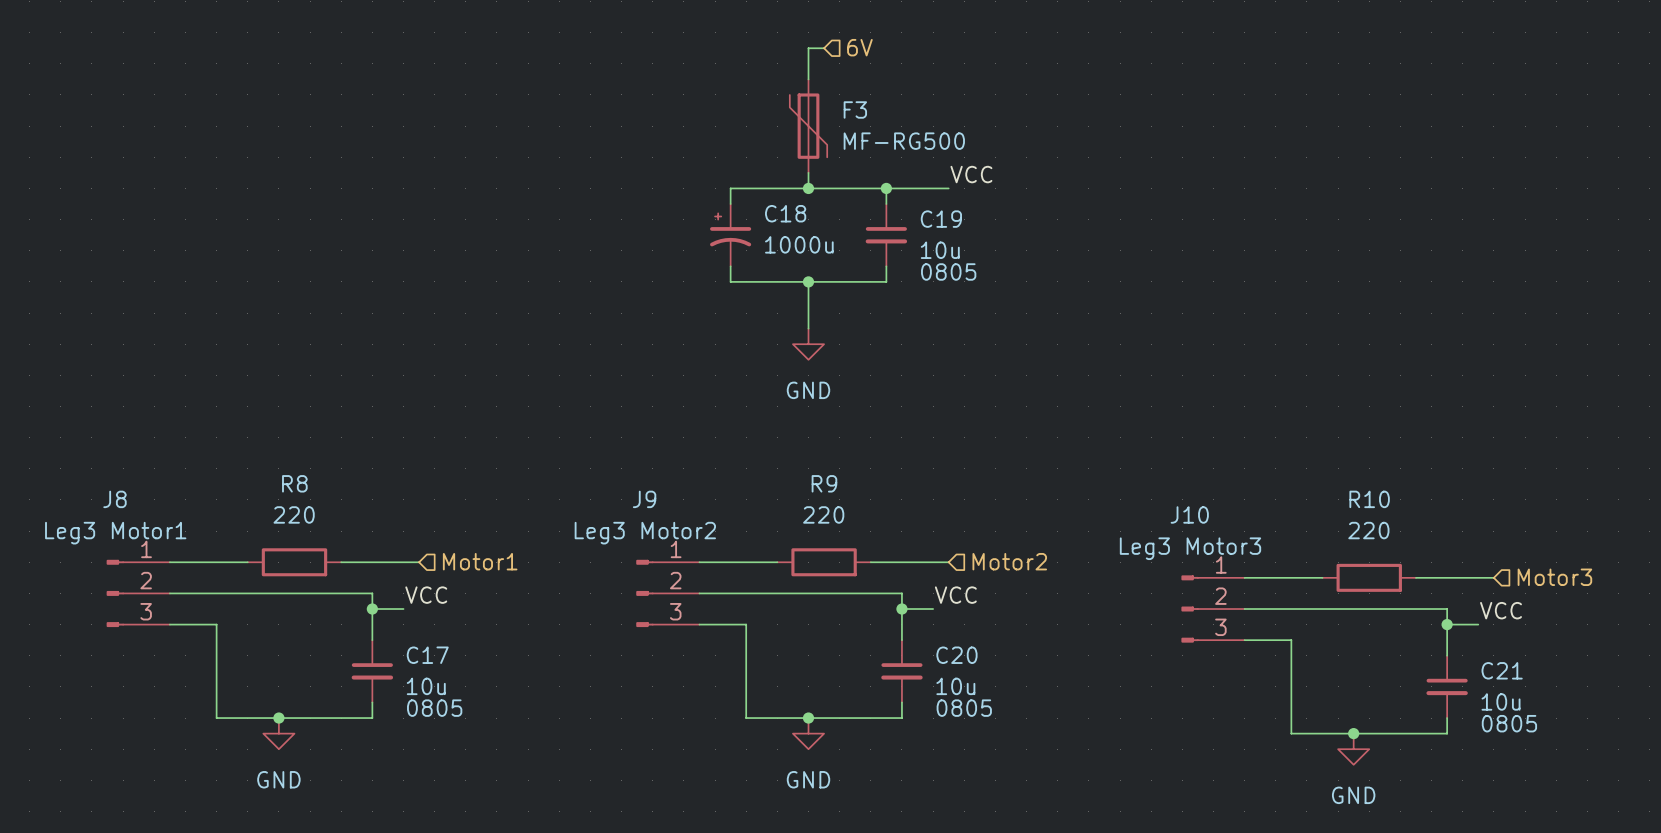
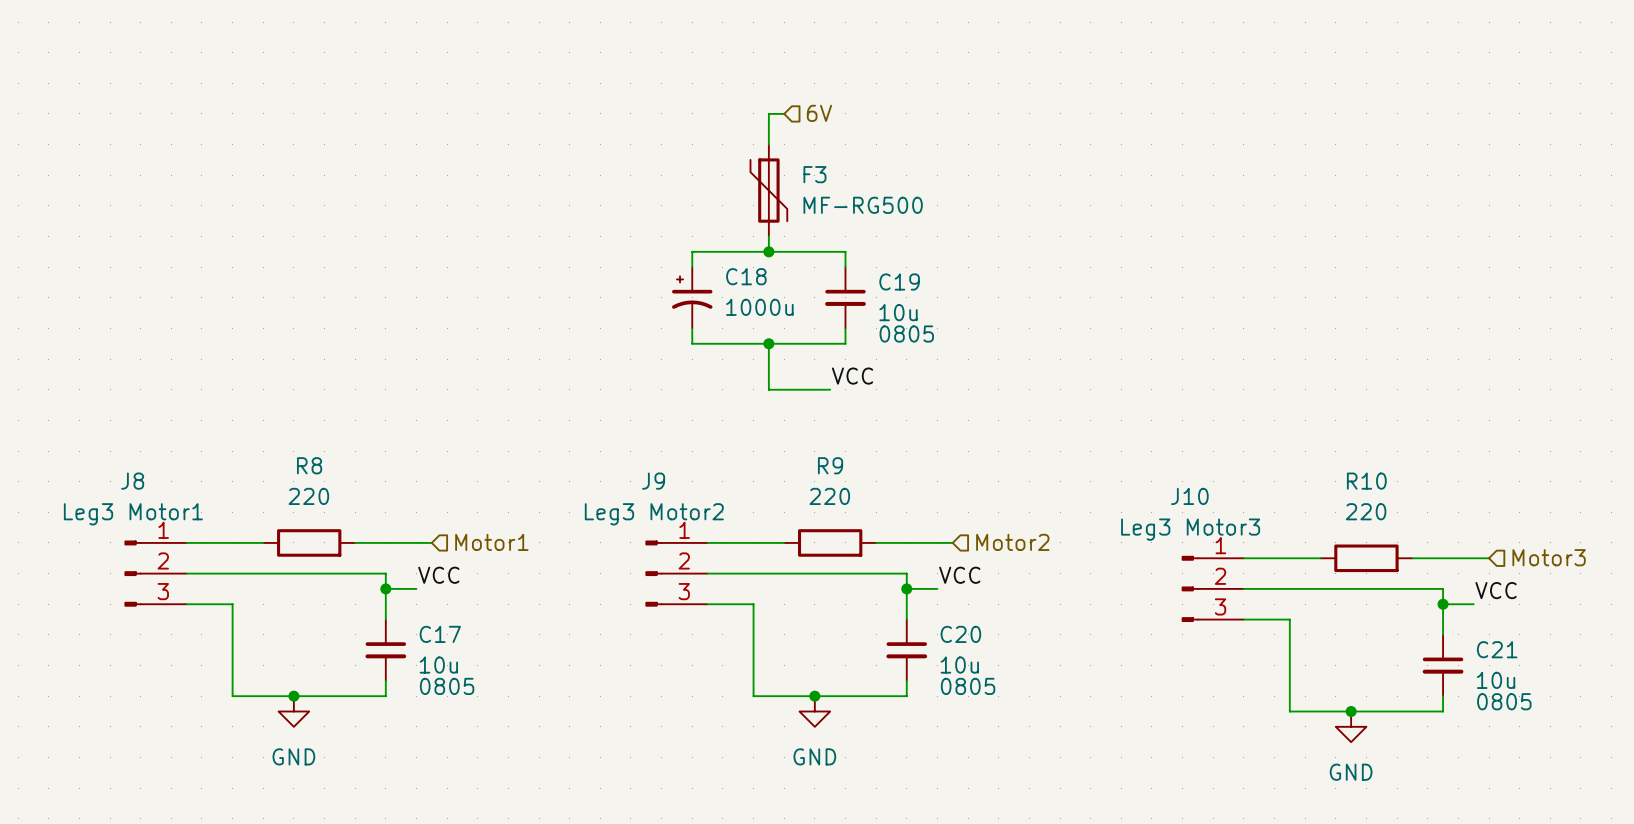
hierarchical label position: 6V (859, 47) -> 6V (819, 113)
wire: (824, 48) (808, 48) (808, 79) -> (784, 113) (768, 113) (768, 144)
F3 position: (808, 126) -> (768, 190)
wire: (808, 172) (808, 188) -> (768, 236) (768, 251)
label position: VCC (971, 174) -> VCC (852, 376)
junction: (808, 188) -> none
wire: (886, 188) (886, 204) -> none
junction: (886, 188) -> none
wire: (948, 188) (730, 188) (730, 204) -> none
C18 position: (730, 235) -> (692, 297)
C19 position: (886, 235) -> (845, 297)
wire: (730, 266) (730, 281) (886, 281) (886, 266) -> (692, 328) (692, 343) (845, 343) (845, 328)
junction: none -> (768, 251)
wire: none -> (692, 267) (692, 251) (845, 251) (845, 267)
wire: (808, 281) (808, 328) -> none
junction: (808, 281) -> none
power symbol: GND (808, 344) -> none
wire: none -> (768, 343) (768, 389) (830, 389)
junction: none -> (768, 343)

